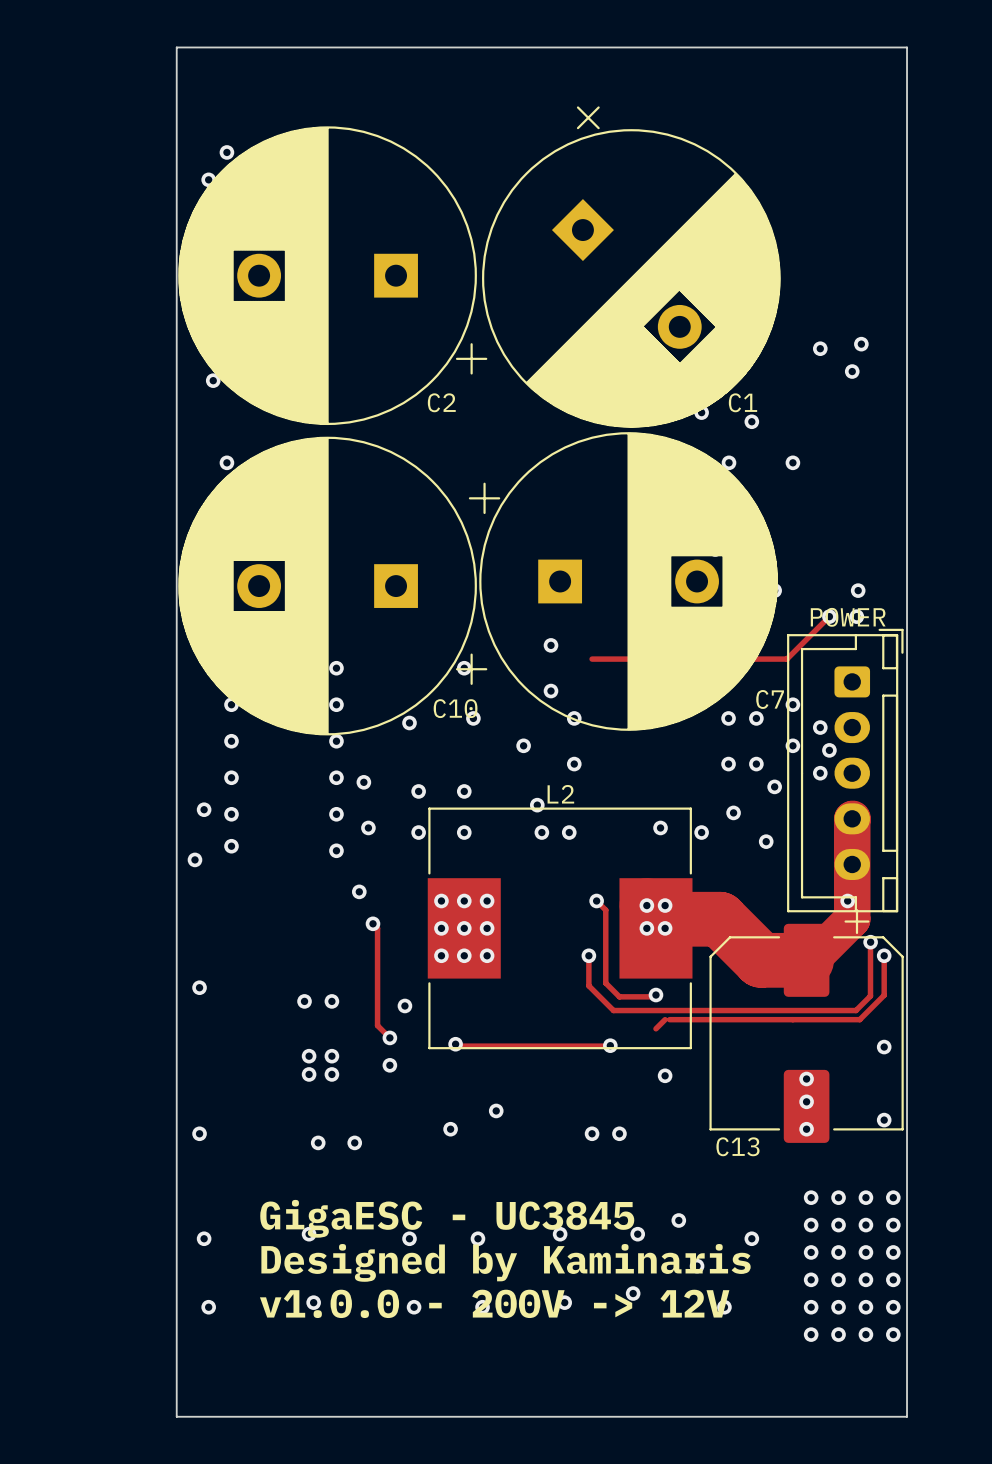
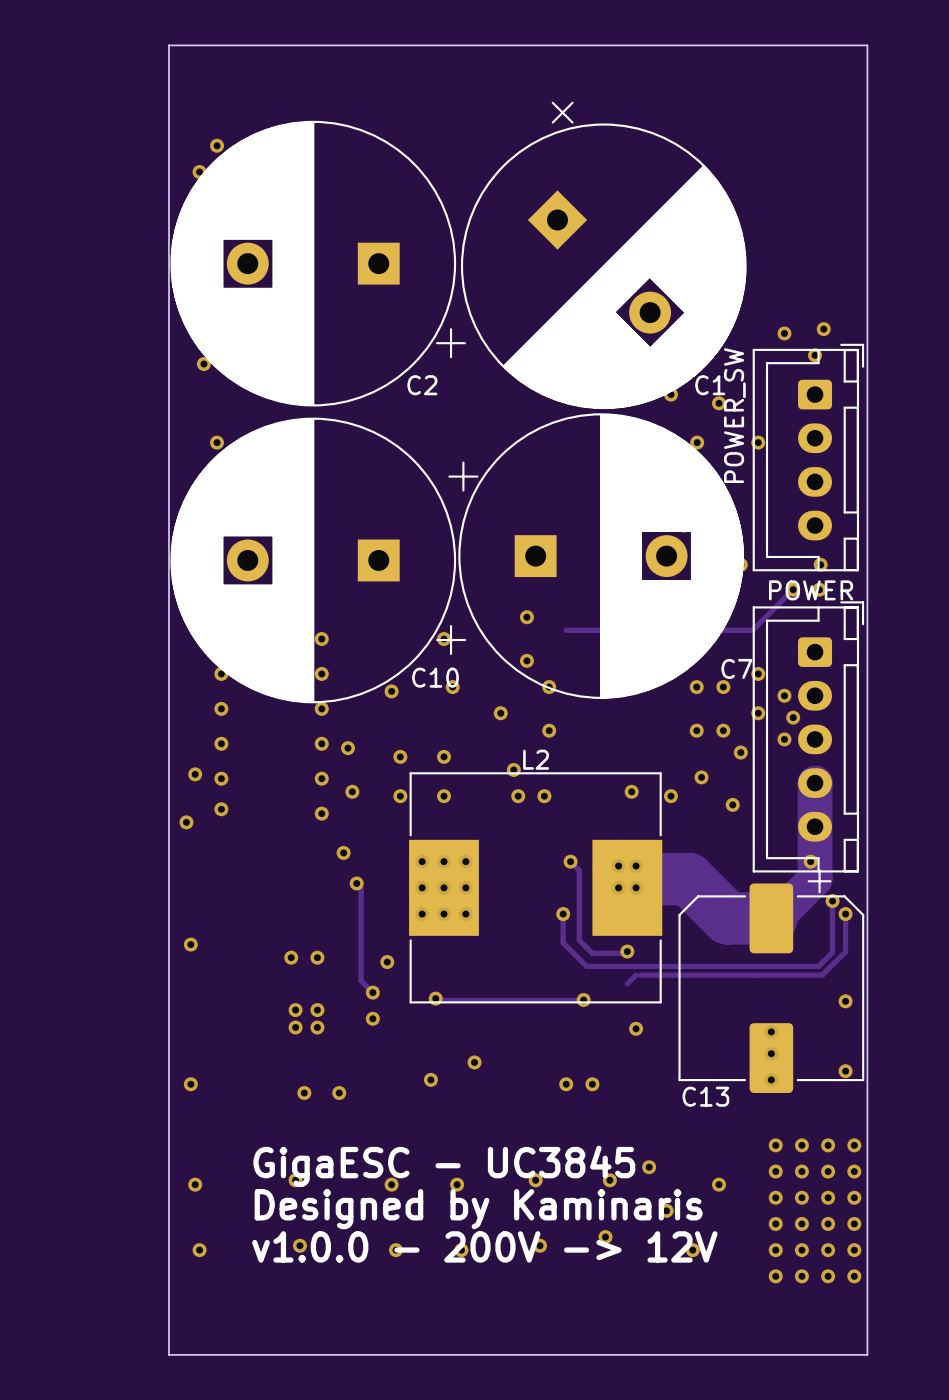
part: none -> POWER_SW (808, 457)

